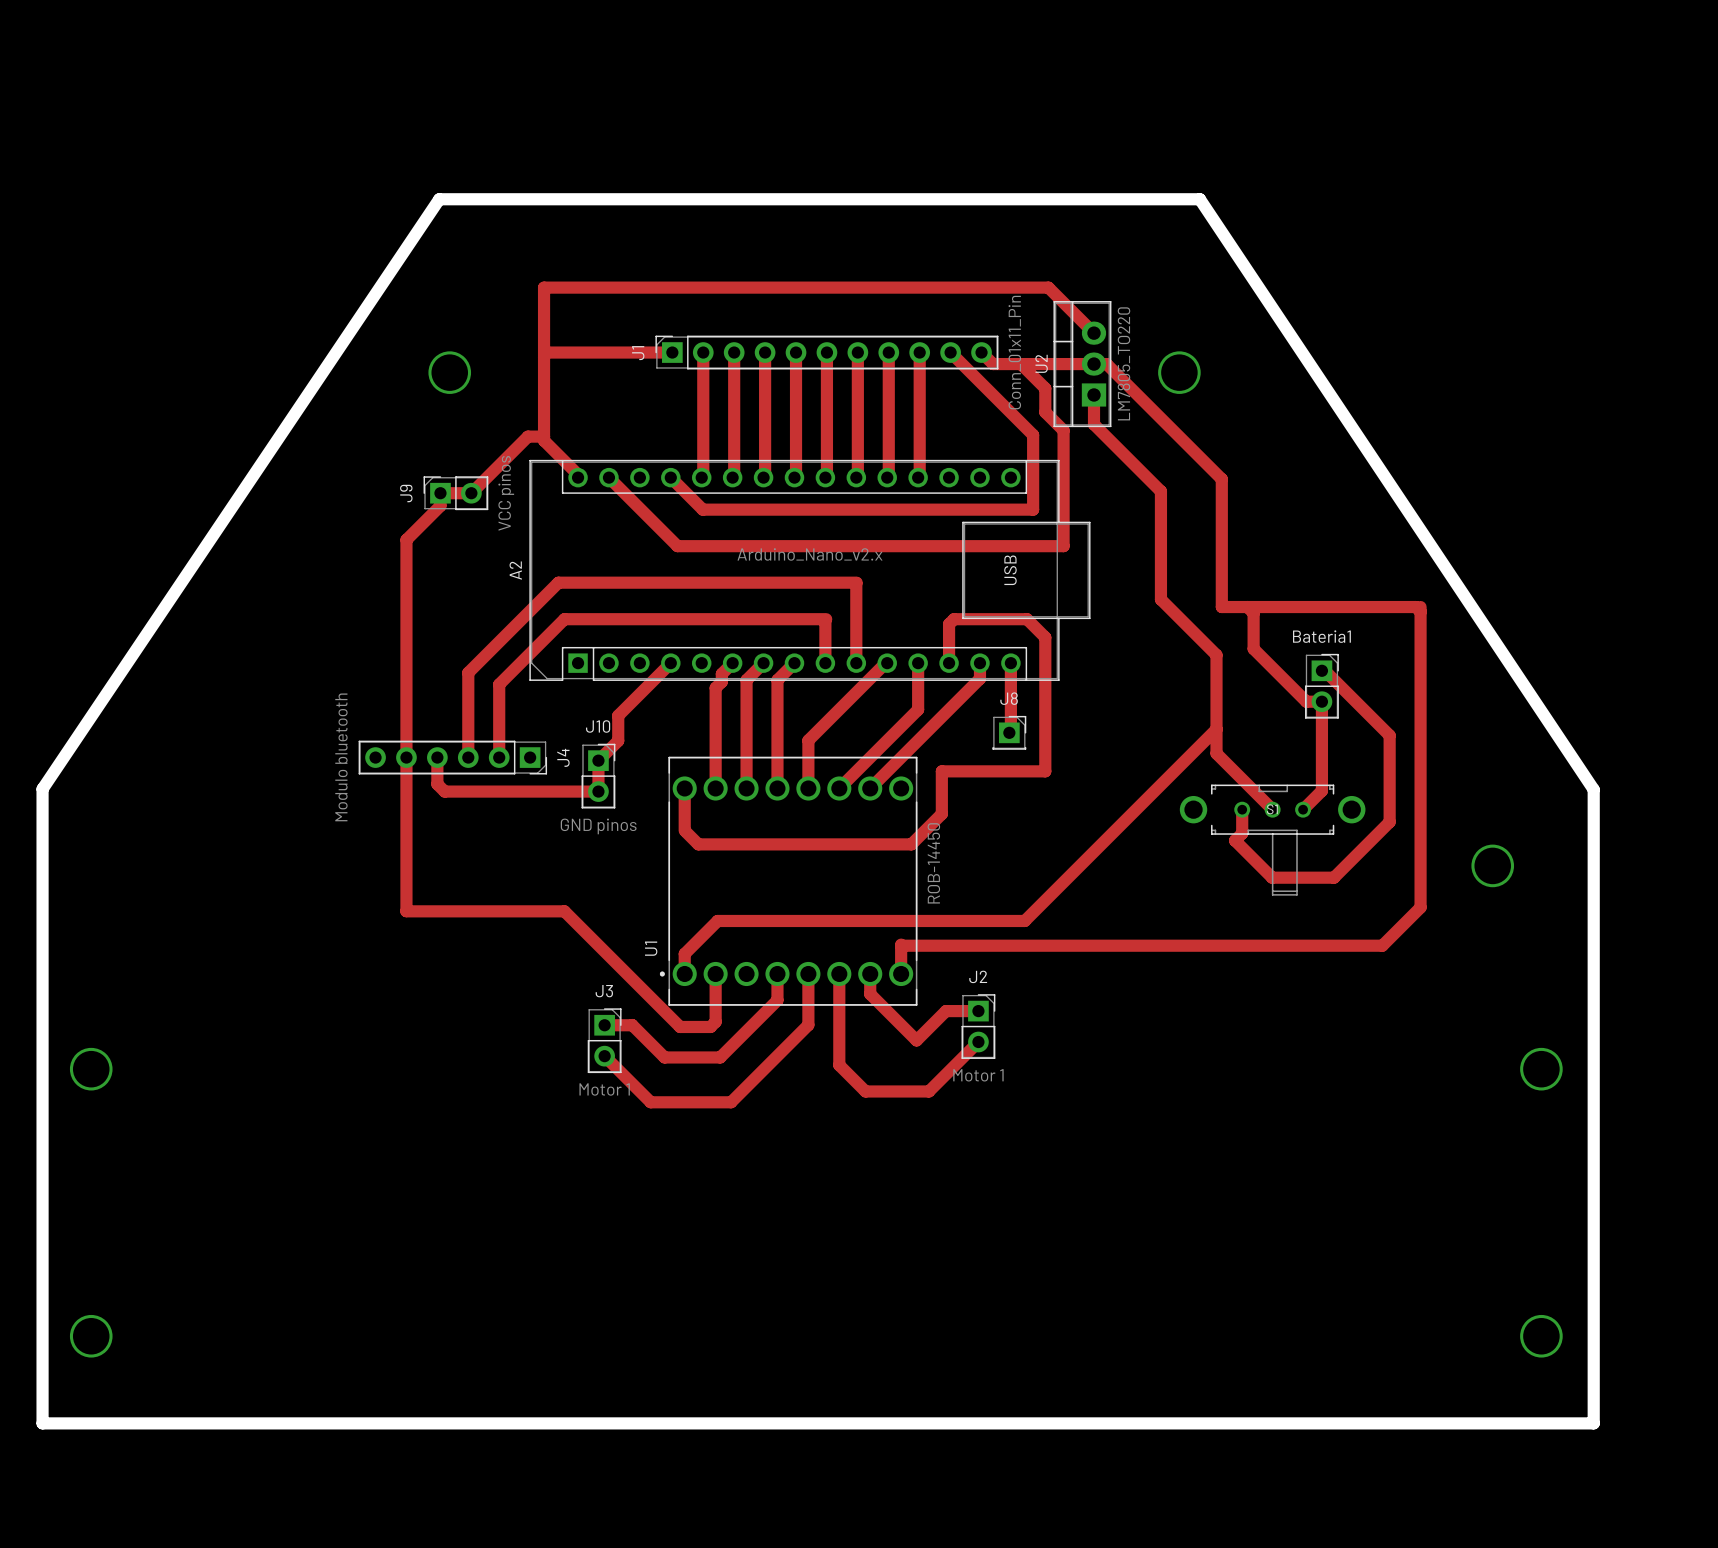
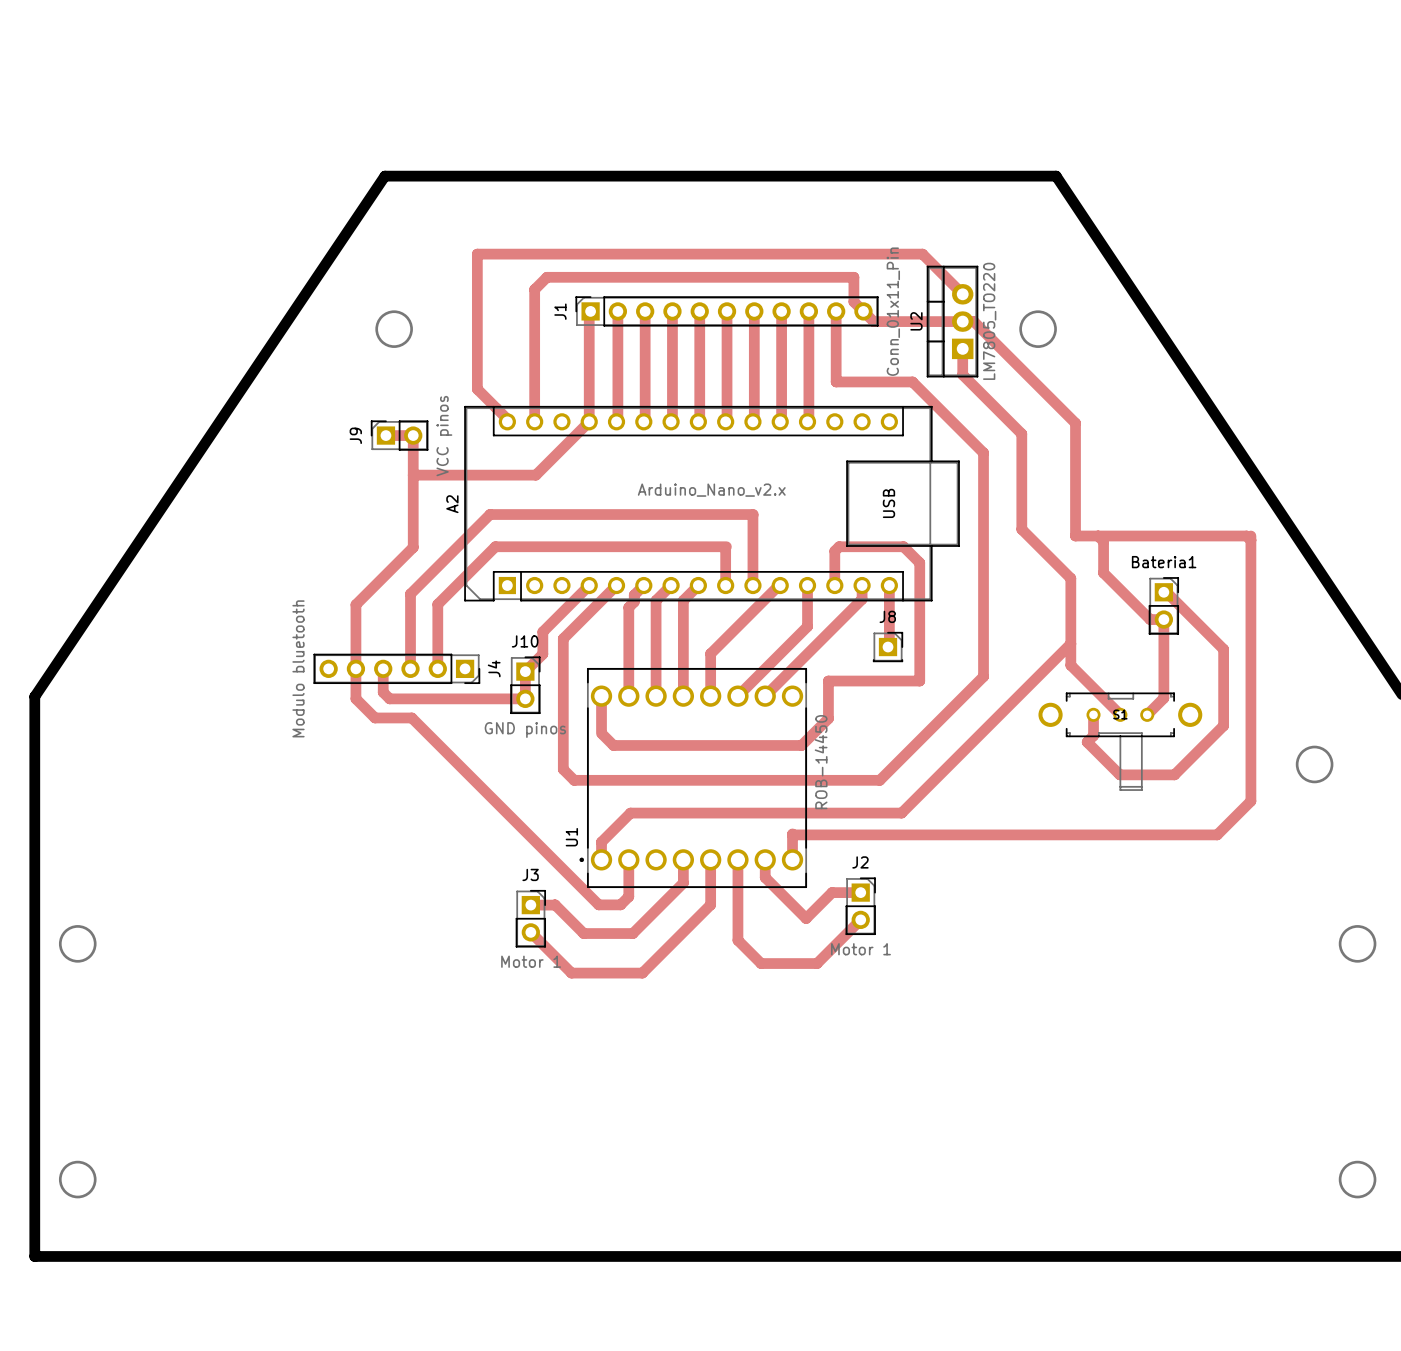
track: (672, 352) (549, 352) (544, 357) -> (590, 311) (589, 421) (535, 475) (413, 475)
track: (950, 352) (1033, 435) (1033, 509) (702, 509) (670, 477) -> (836, 311) (836, 381) (912, 381) (983, 452) (983, 676) (879, 780) (574, 780) (563, 769) (563, 638) (616, 585)
track: (1020, 364) (1045, 388) (1045, 412) (1063, 430) (1063, 546) (677, 546) (608, 477) -> (863, 311) (853, 301) (853, 277) (546, 277) (534, 289) (534, 421)
track: (544, 436) (527, 436) (471, 493) -> none
track: (440, 493) (440, 505) (406, 539) (406, 684) -> (413, 435) (413, 547) (355, 604)
track: (406, 791) (406, 911) (564, 911) (680, 1026) (710, 1026) (715, 1021) (715, 1015) -> (355, 698) (375, 717) (411, 717) (598, 904) (620, 904) (628, 896)

